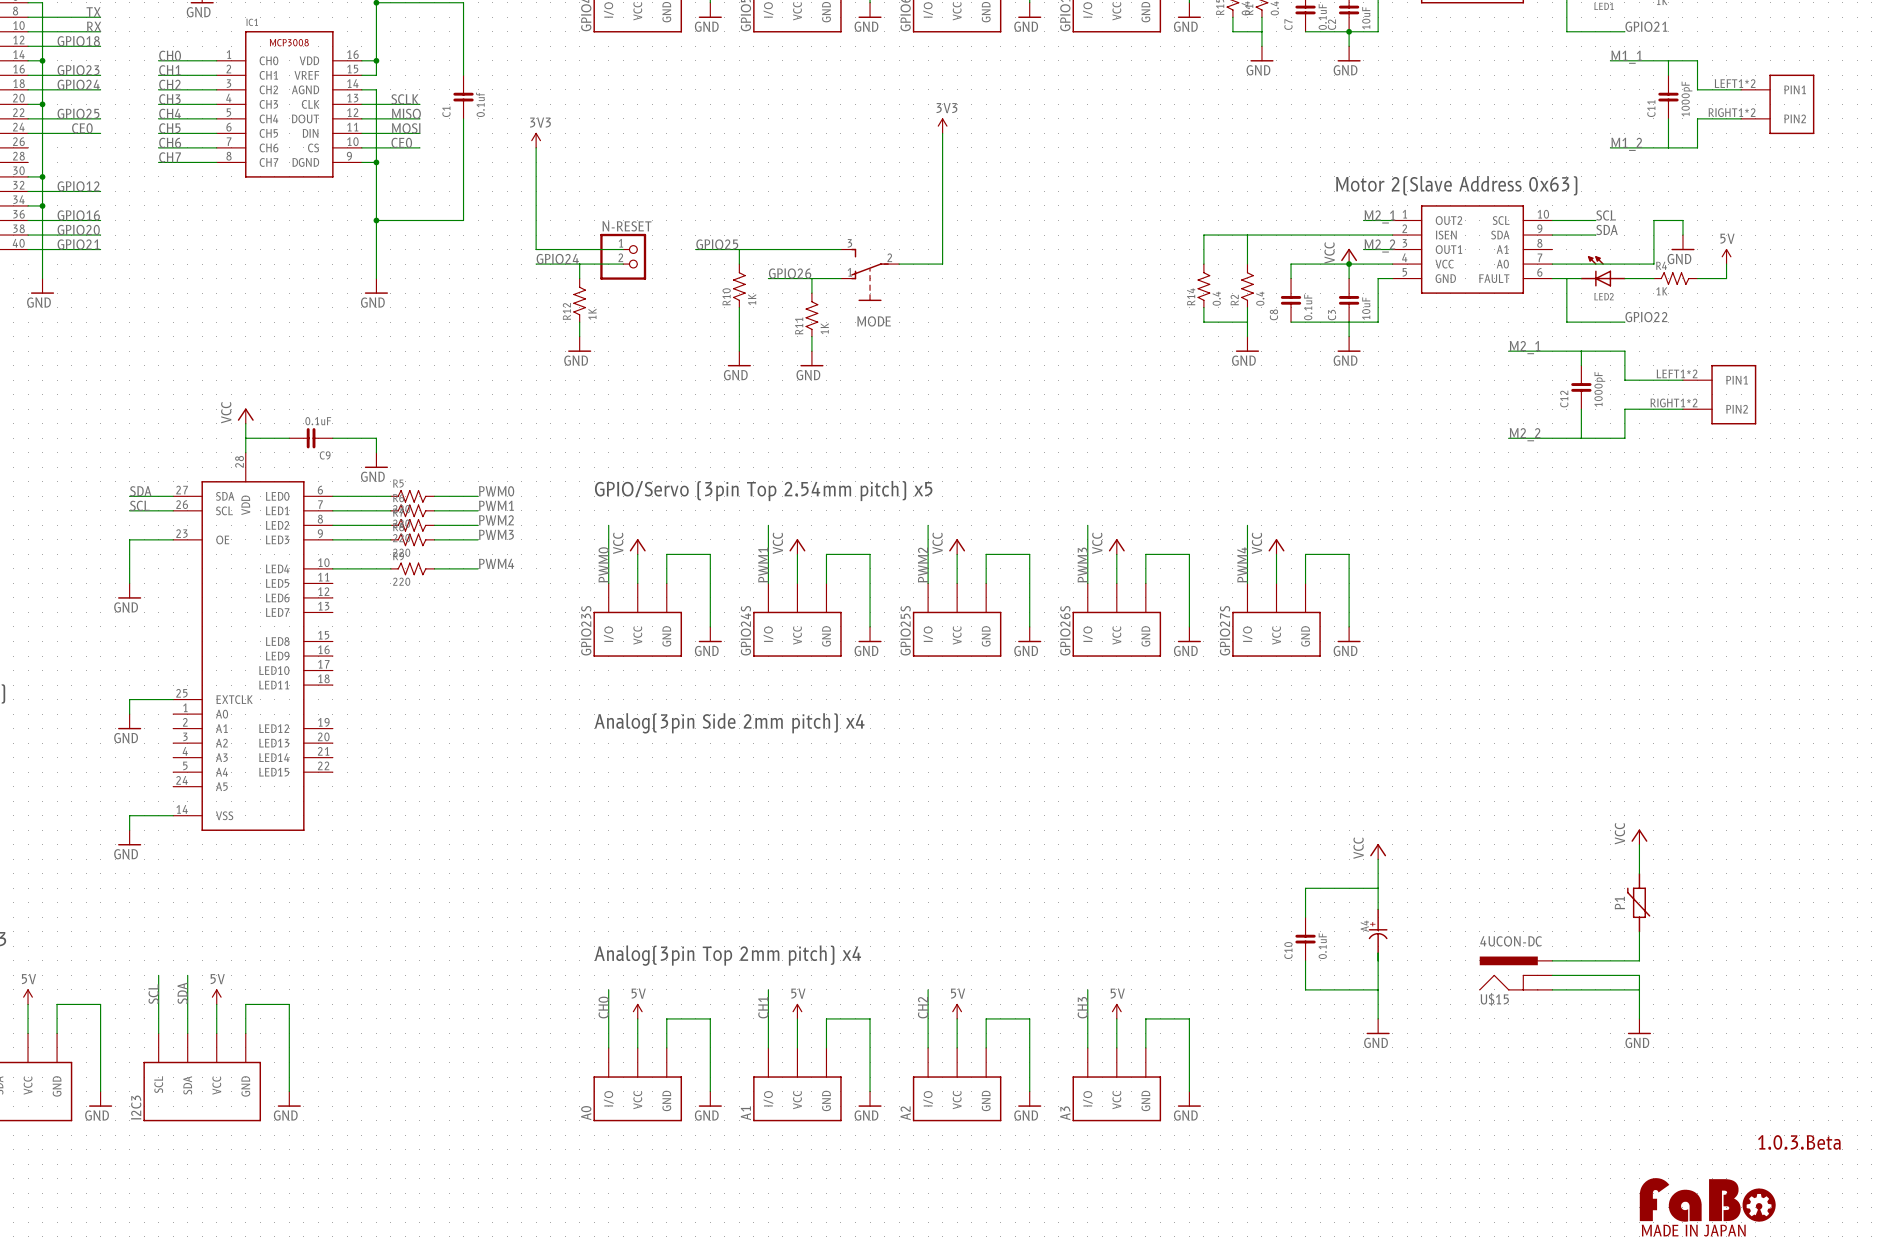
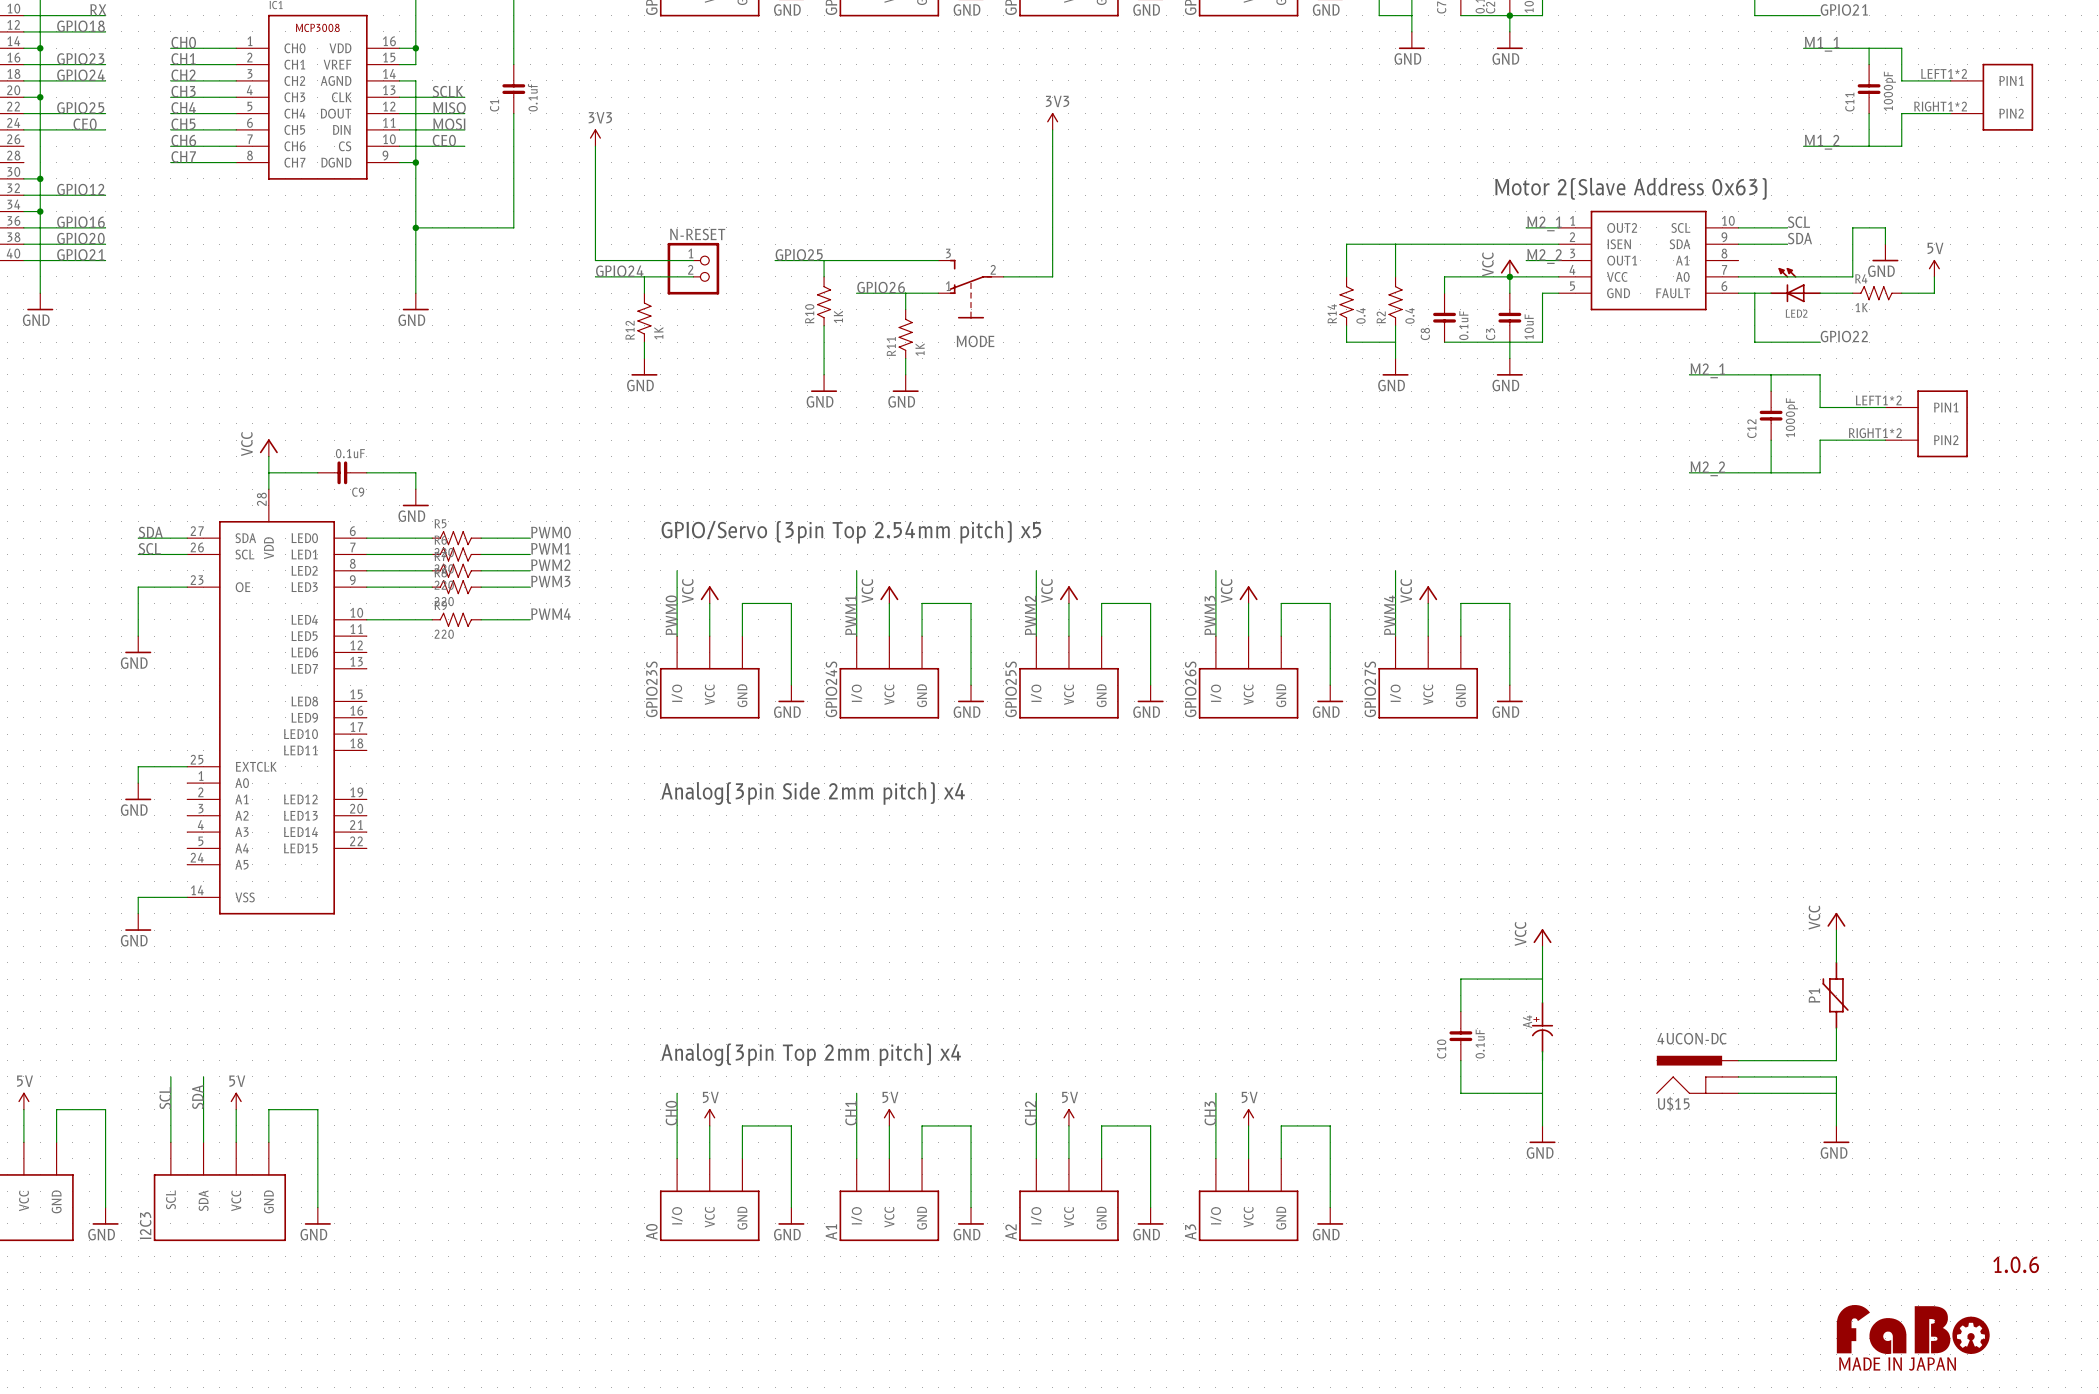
text: 1.0.3.Beta (1799, 1142) -> 1.0.6 (2016, 1264)

